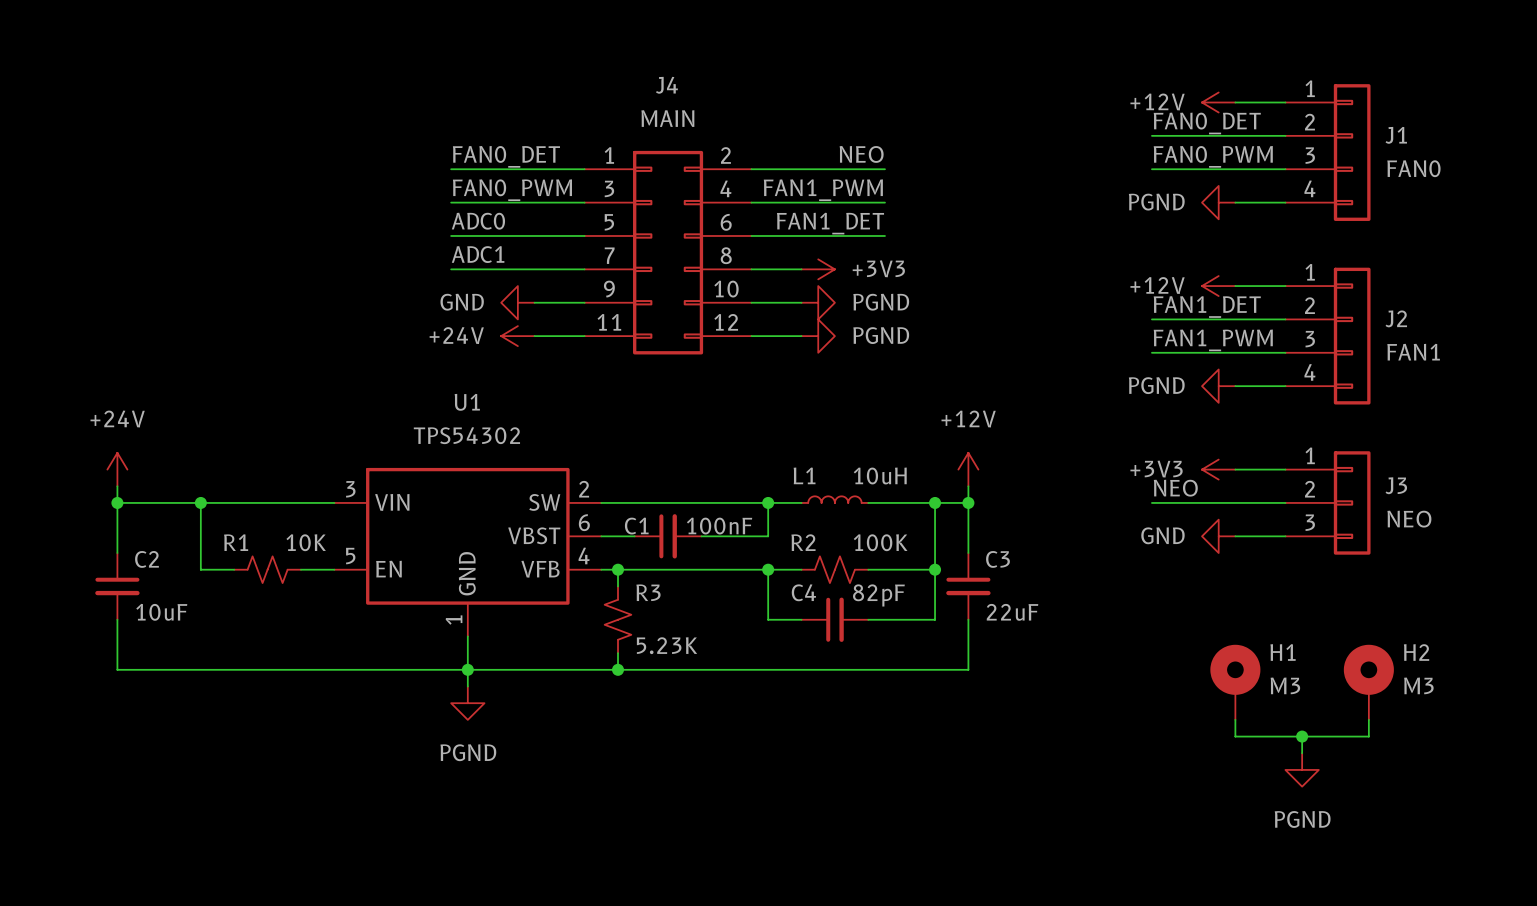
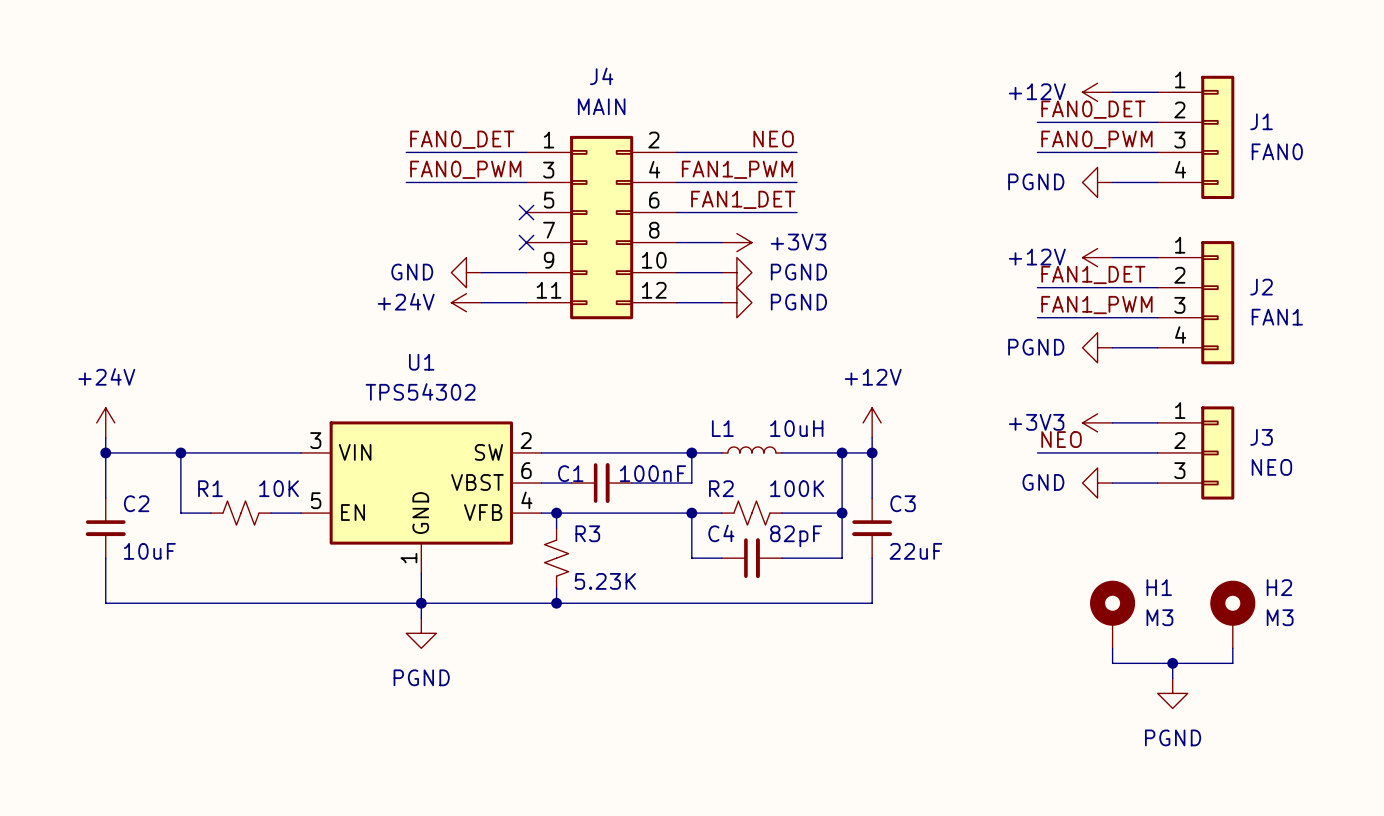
label: ADC0 (478, 221) -> none
wire: (451, 235) (584, 235) -> none
no-connect mark: none -> (526, 212)
label: ADC1 (478, 254) -> none
wire: (451, 269) (584, 269) -> none
no-connect mark: none -> (526, 242)

